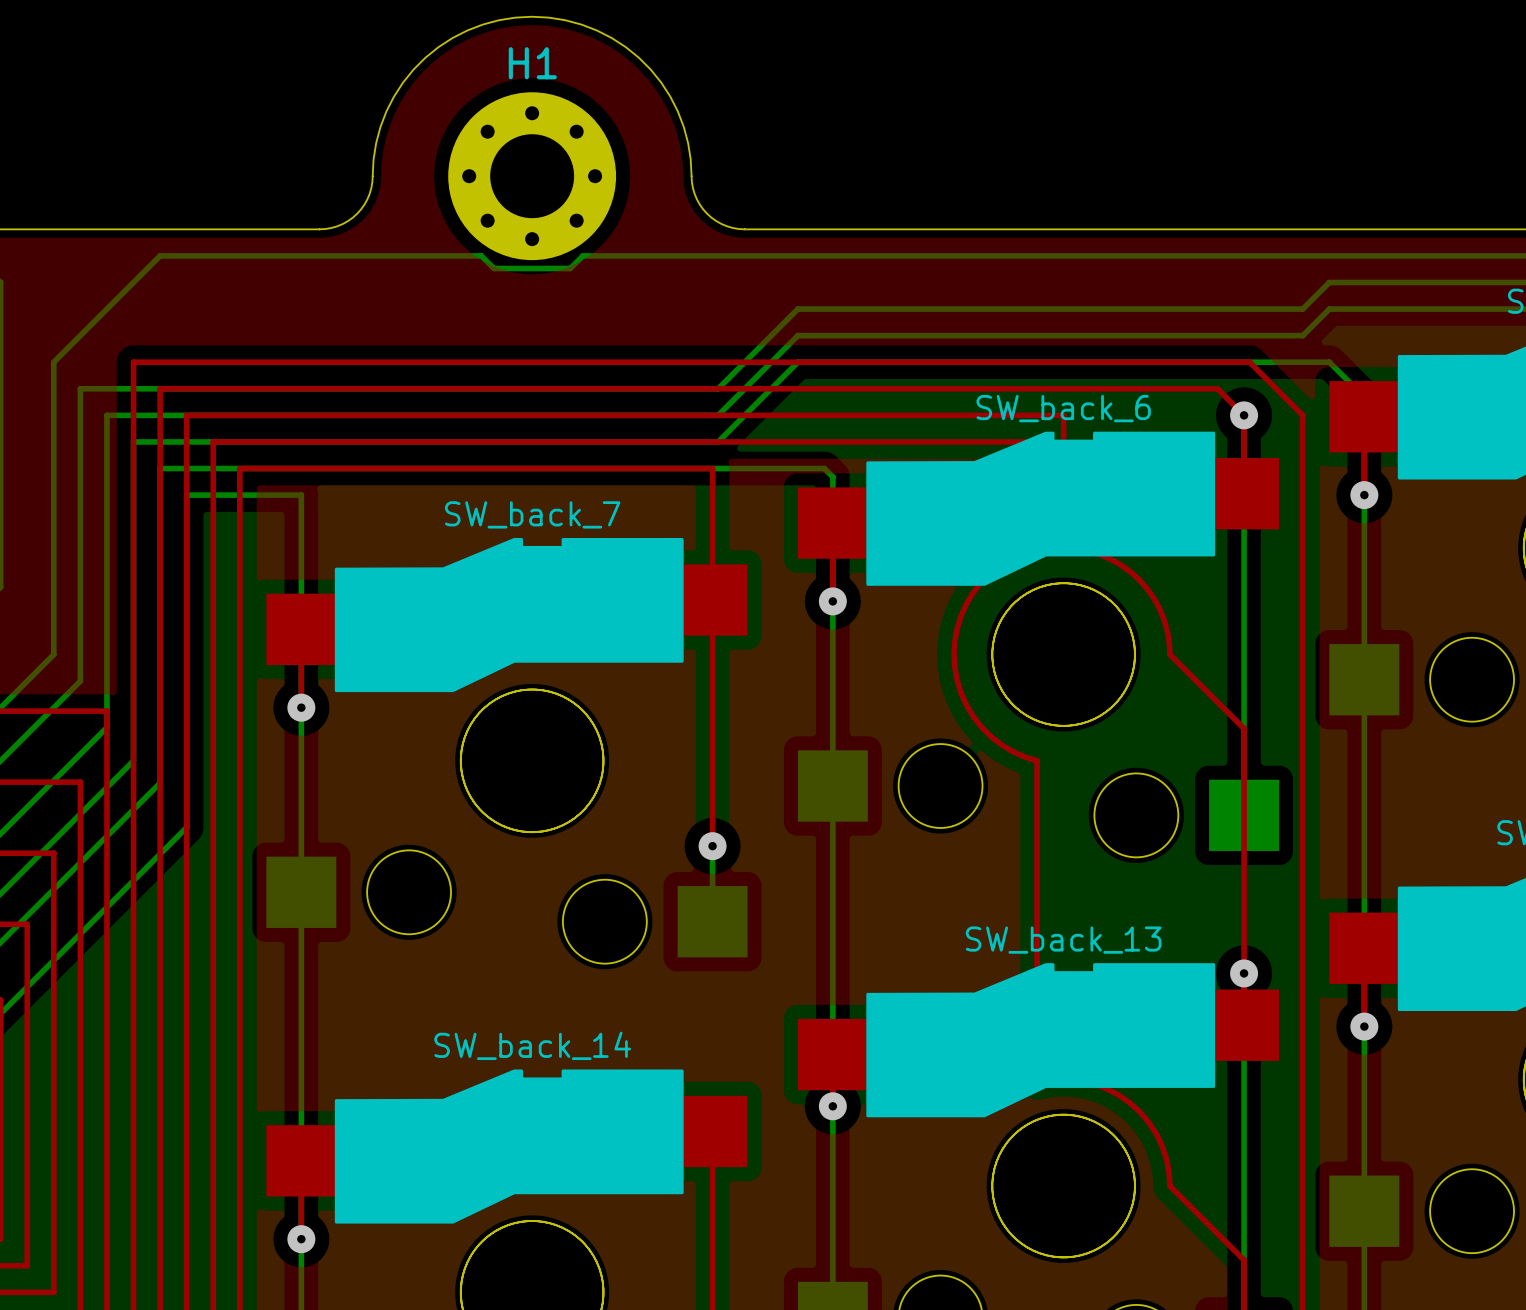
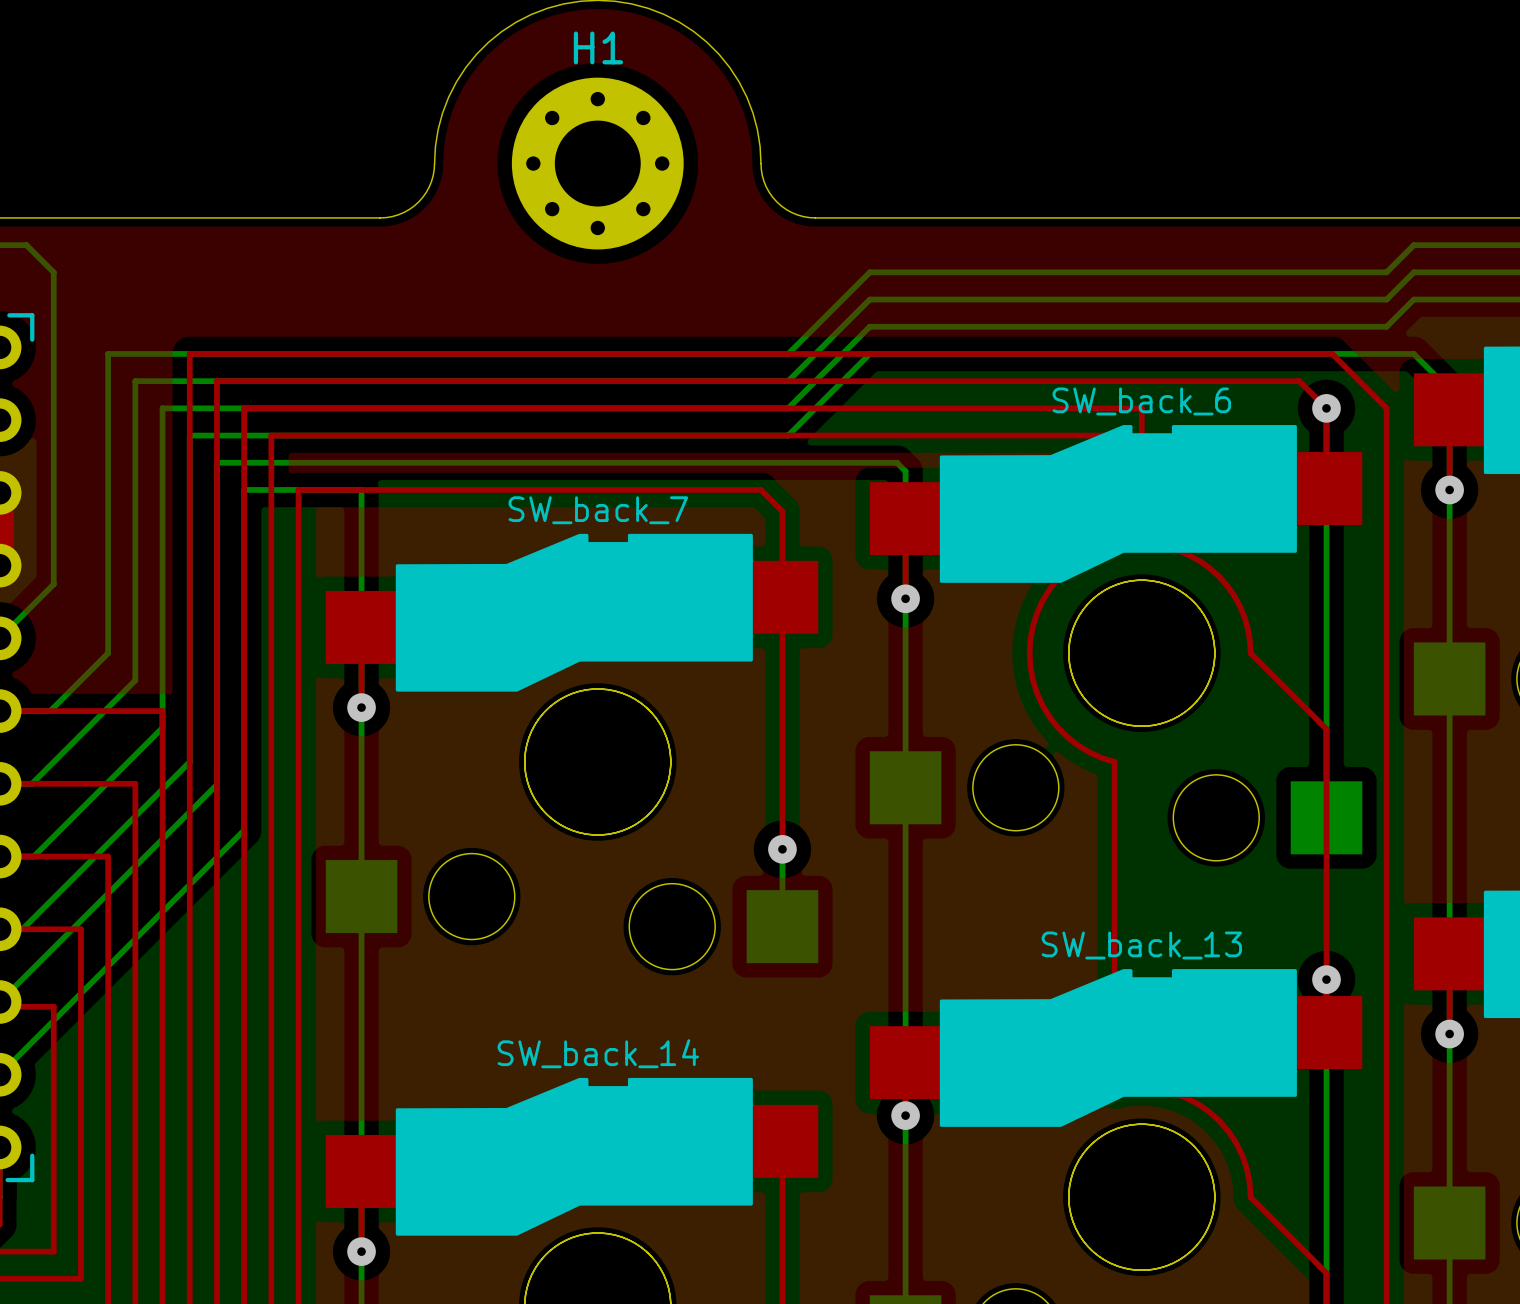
bottom track: (1329, 255) (582, 255) (570, 268) (493, 268) (481, 255) (160, 255) (53, 362) -> (1413, 245) (1386, 272) (869, 272) (788, 353) (108, 353)
top track: (239, 495) (239, 468) (712, 468) (712, 516) -> (298, 489) (760, 489) (782, 511)

